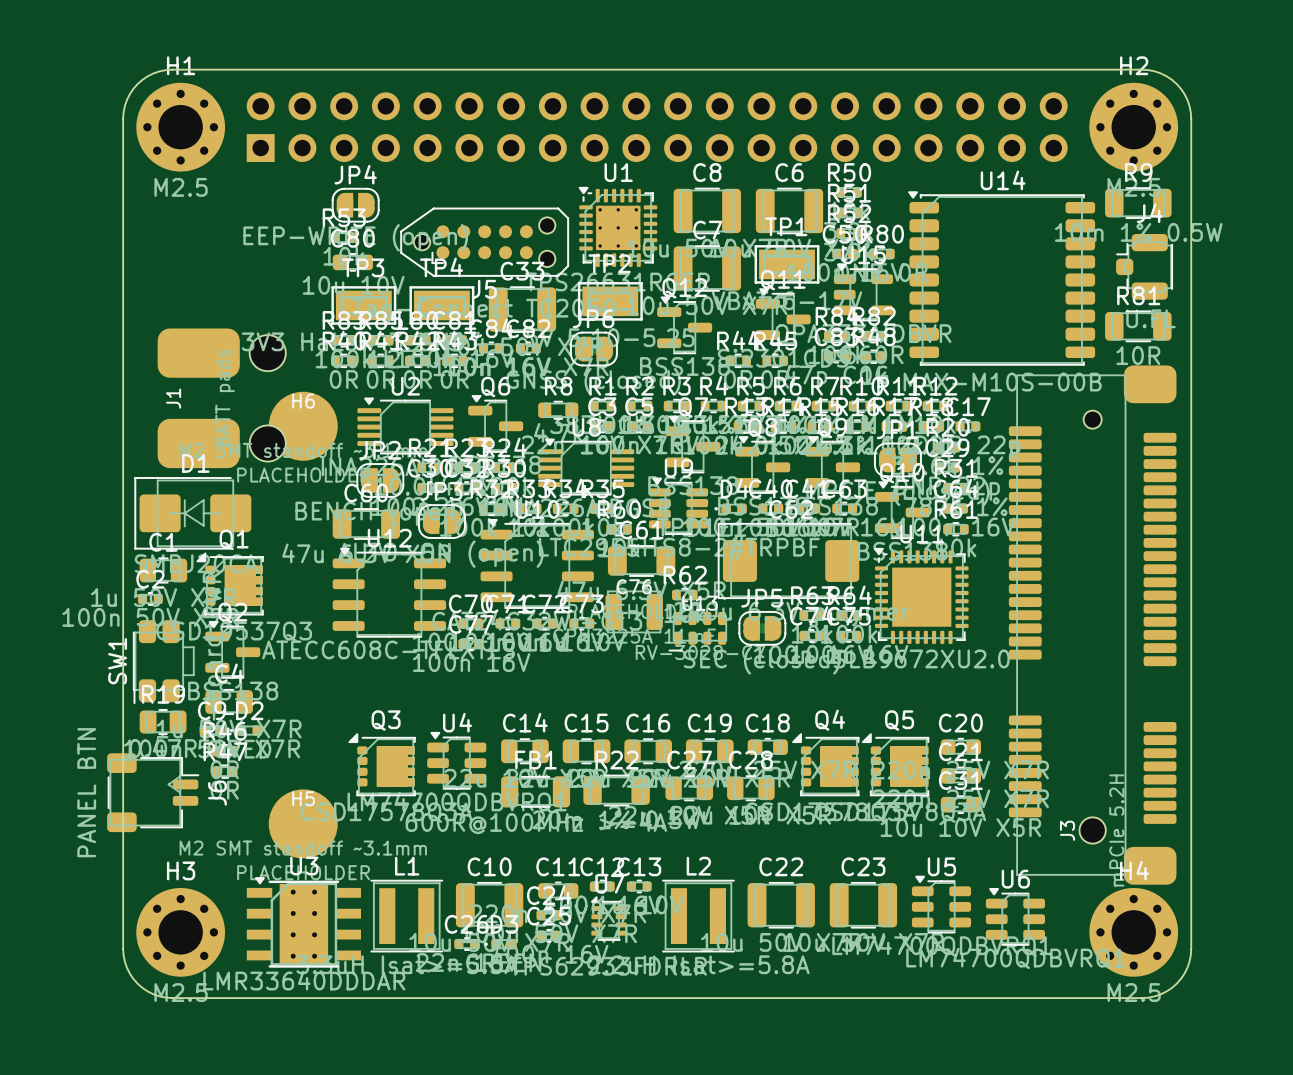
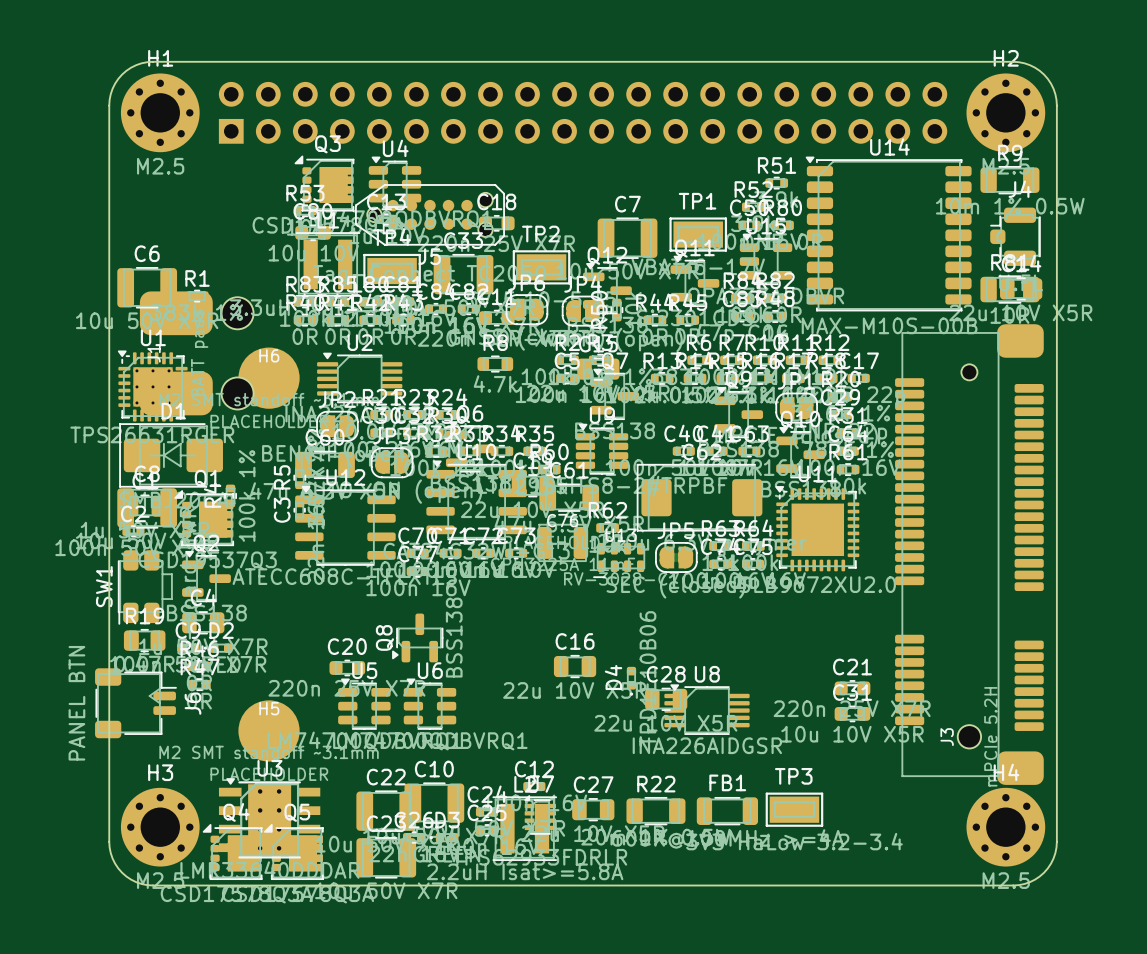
R50 rotation: 0° (849, 192) -> 90° clockwise (616, 310)
R50 position: (849, 192) -> (616, 310)
JP4 position: (355, 205) -> (583, 311)
C8 position: (707, 210) -> (147, 507)
C6 position: (789, 210) -> (147, 287)
R51 position: (849, 212) -> (776, 183)
U1 position: (617, 226) -> (152, 386)
U14 position: (1001, 278) -> (888, 233)
TP3 position: (363, 305) -> (794, 809)
R1 position: (602, 406) -> (197, 296)
R4 rotation: 0° (713, 406) -> 90° clockwise (230, 495)
R4 position: (713, 406) -> (230, 495)
R5 rotation: 0° (750, 406) -> 90° clockwise (299, 477)
R5 position: (750, 406) -> (299, 477)
Q6 position: (495, 423) -> (470, 446)
C3 rotation: 0° (602, 426) -> 90° clockwise (299, 510)
C3 position: (602, 426) -> (299, 510)
Q8 rotation: 0° (762, 465) -> 90° counterclockwise (417, 637)
Q8 position: (762, 465) -> (417, 637)
U8 position: (586, 467) -> (706, 709)
D4 rotation: 0° (730, 508) -> 90° counterclockwise (631, 681)
D4 position: (730, 508) -> (631, 681)
C18 position: (767, 747) -> (496, 223)
C20 position: (960, 747) -> (347, 667)
C14 position: (524, 751) -> (1021, 288)
C15 position: (586, 751) -> (598, 369)
C19 position: (709, 751) -> (532, 485)
U4 position: (456, 760) -> (395, 182)
Q3 position: (382, 764) -> (324, 183)
Q4 position: (825, 764) -> (232, 851)
Q5 position: (895, 764) -> (293, 851)
C27 position: (689, 788) -> (593, 809)
R22 position: (616, 790) -> (655, 811)
FB1 position: (535, 791) -> (727, 811)
C13 position: (639, 886) -> (386, 219)
C11 position: (558, 890) -> (496, 318)
U5 position: (941, 904) -> (364, 704)
C22 position: (781, 905) -> (386, 811)
C23 position: (863, 905) -> (386, 857)
L1 position: (406, 916) -> (327, 264)
L2 position: (698, 916) -> (524, 828)
U6 position: (1015, 916) -> (429, 704)

